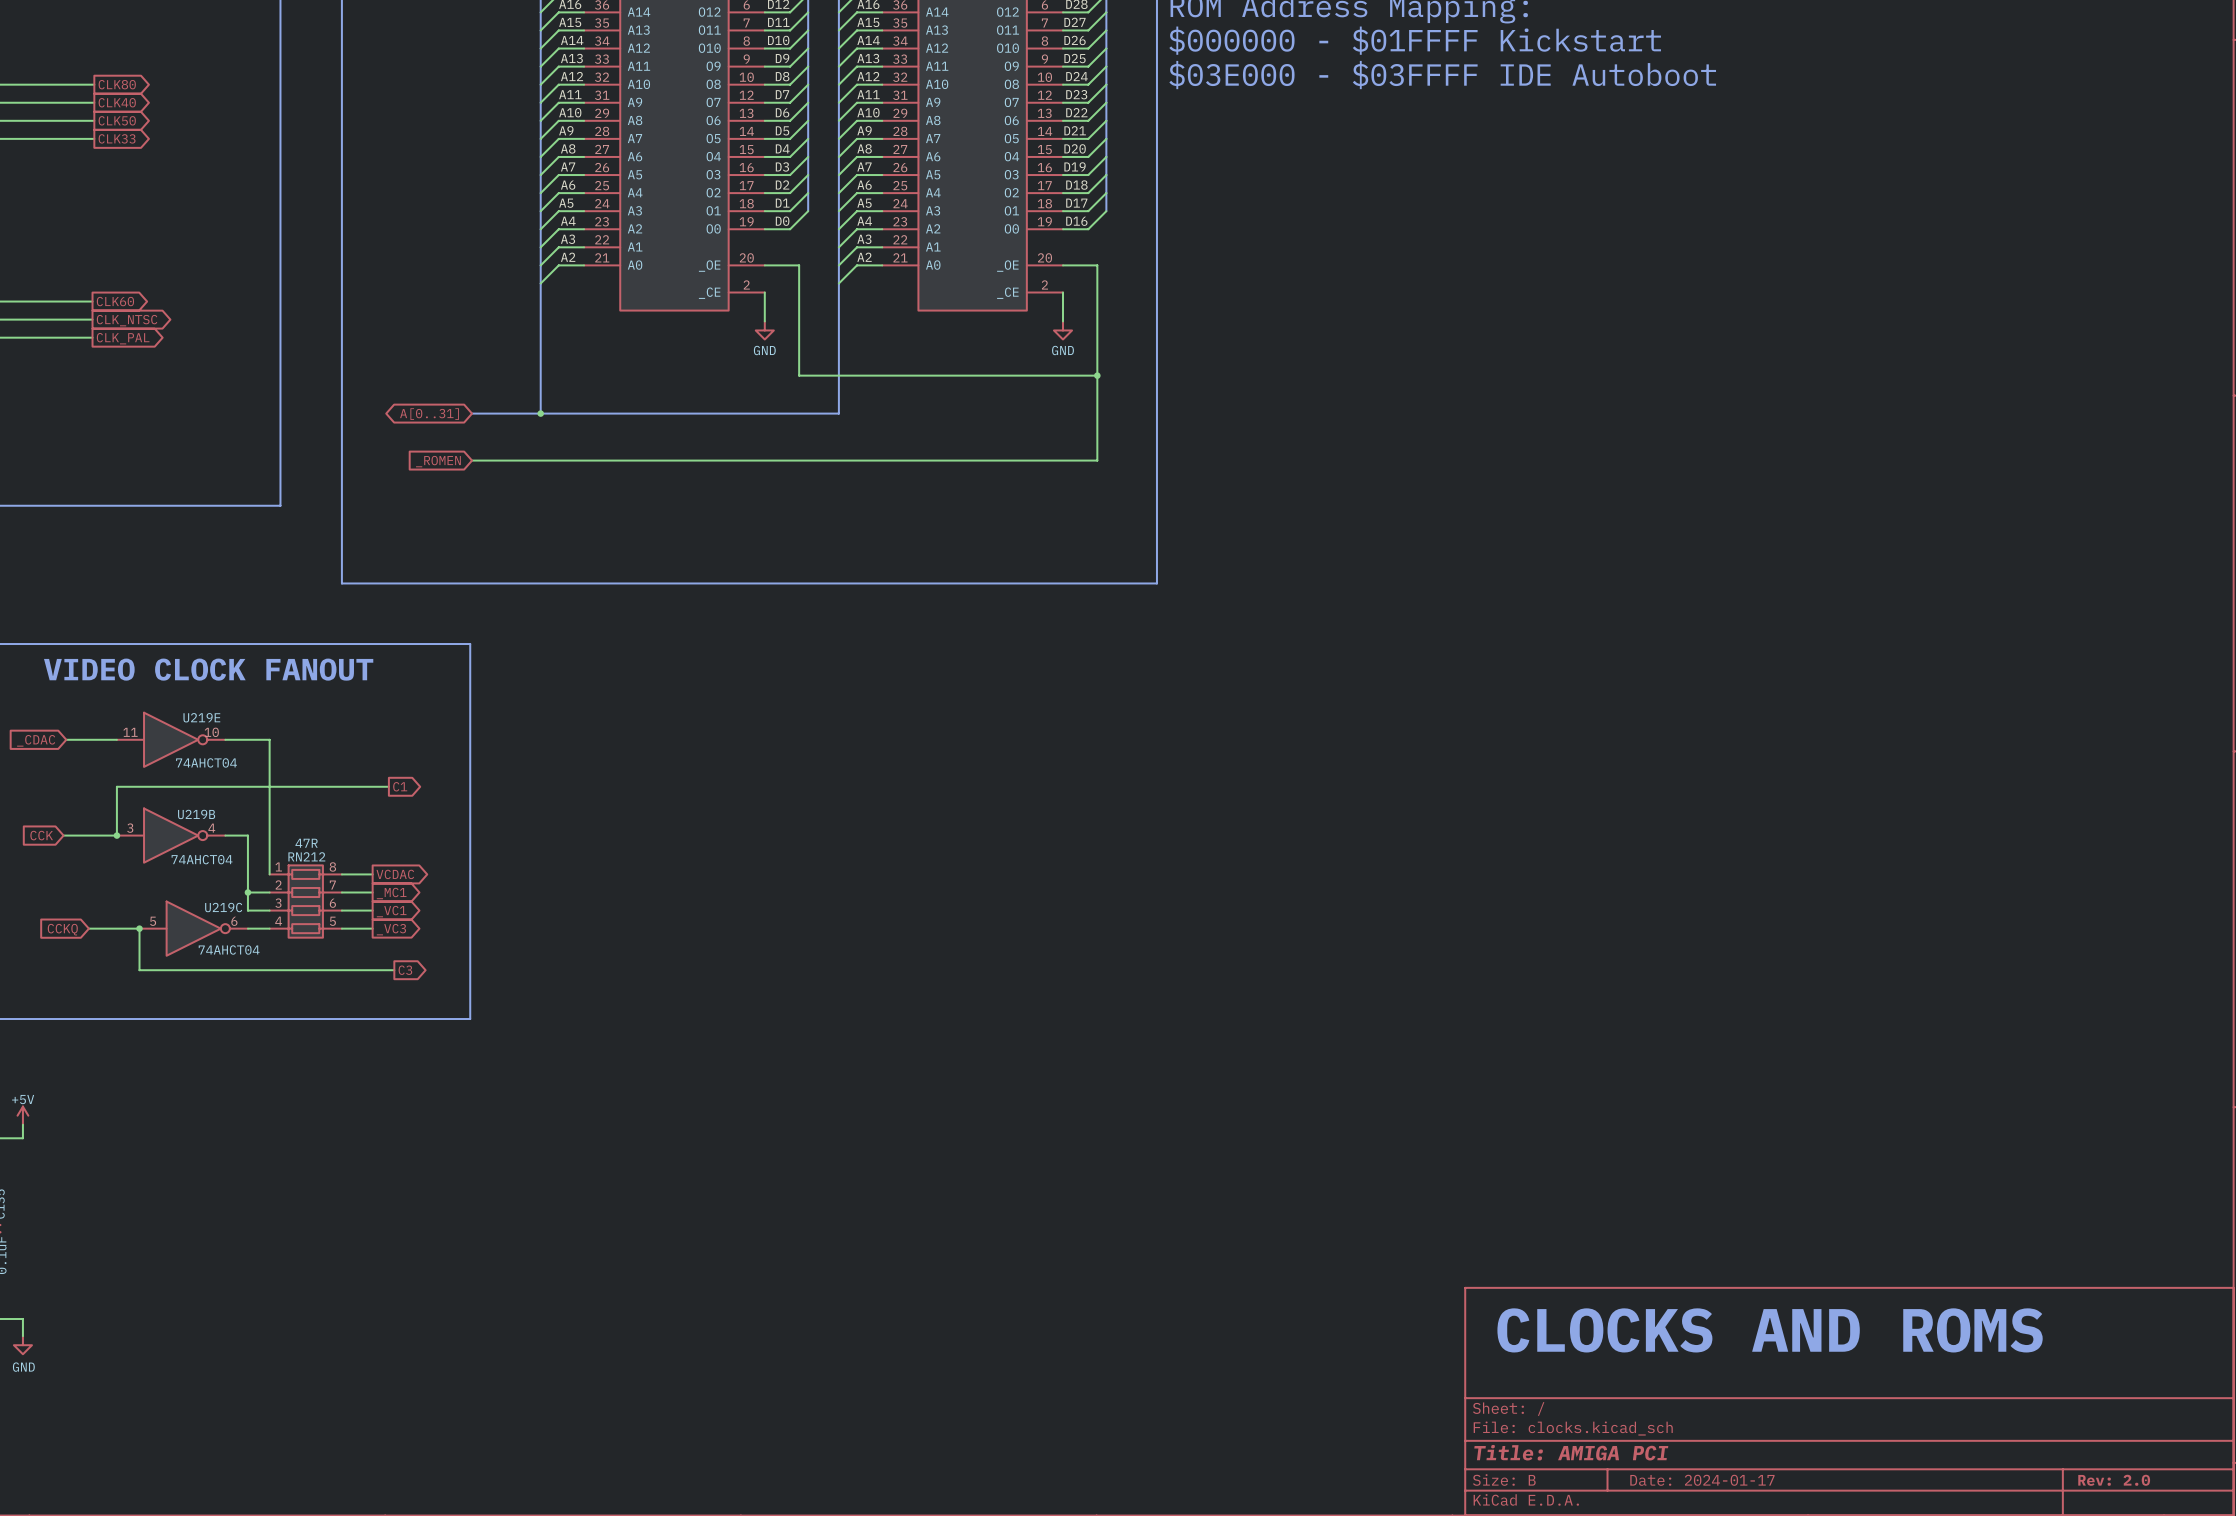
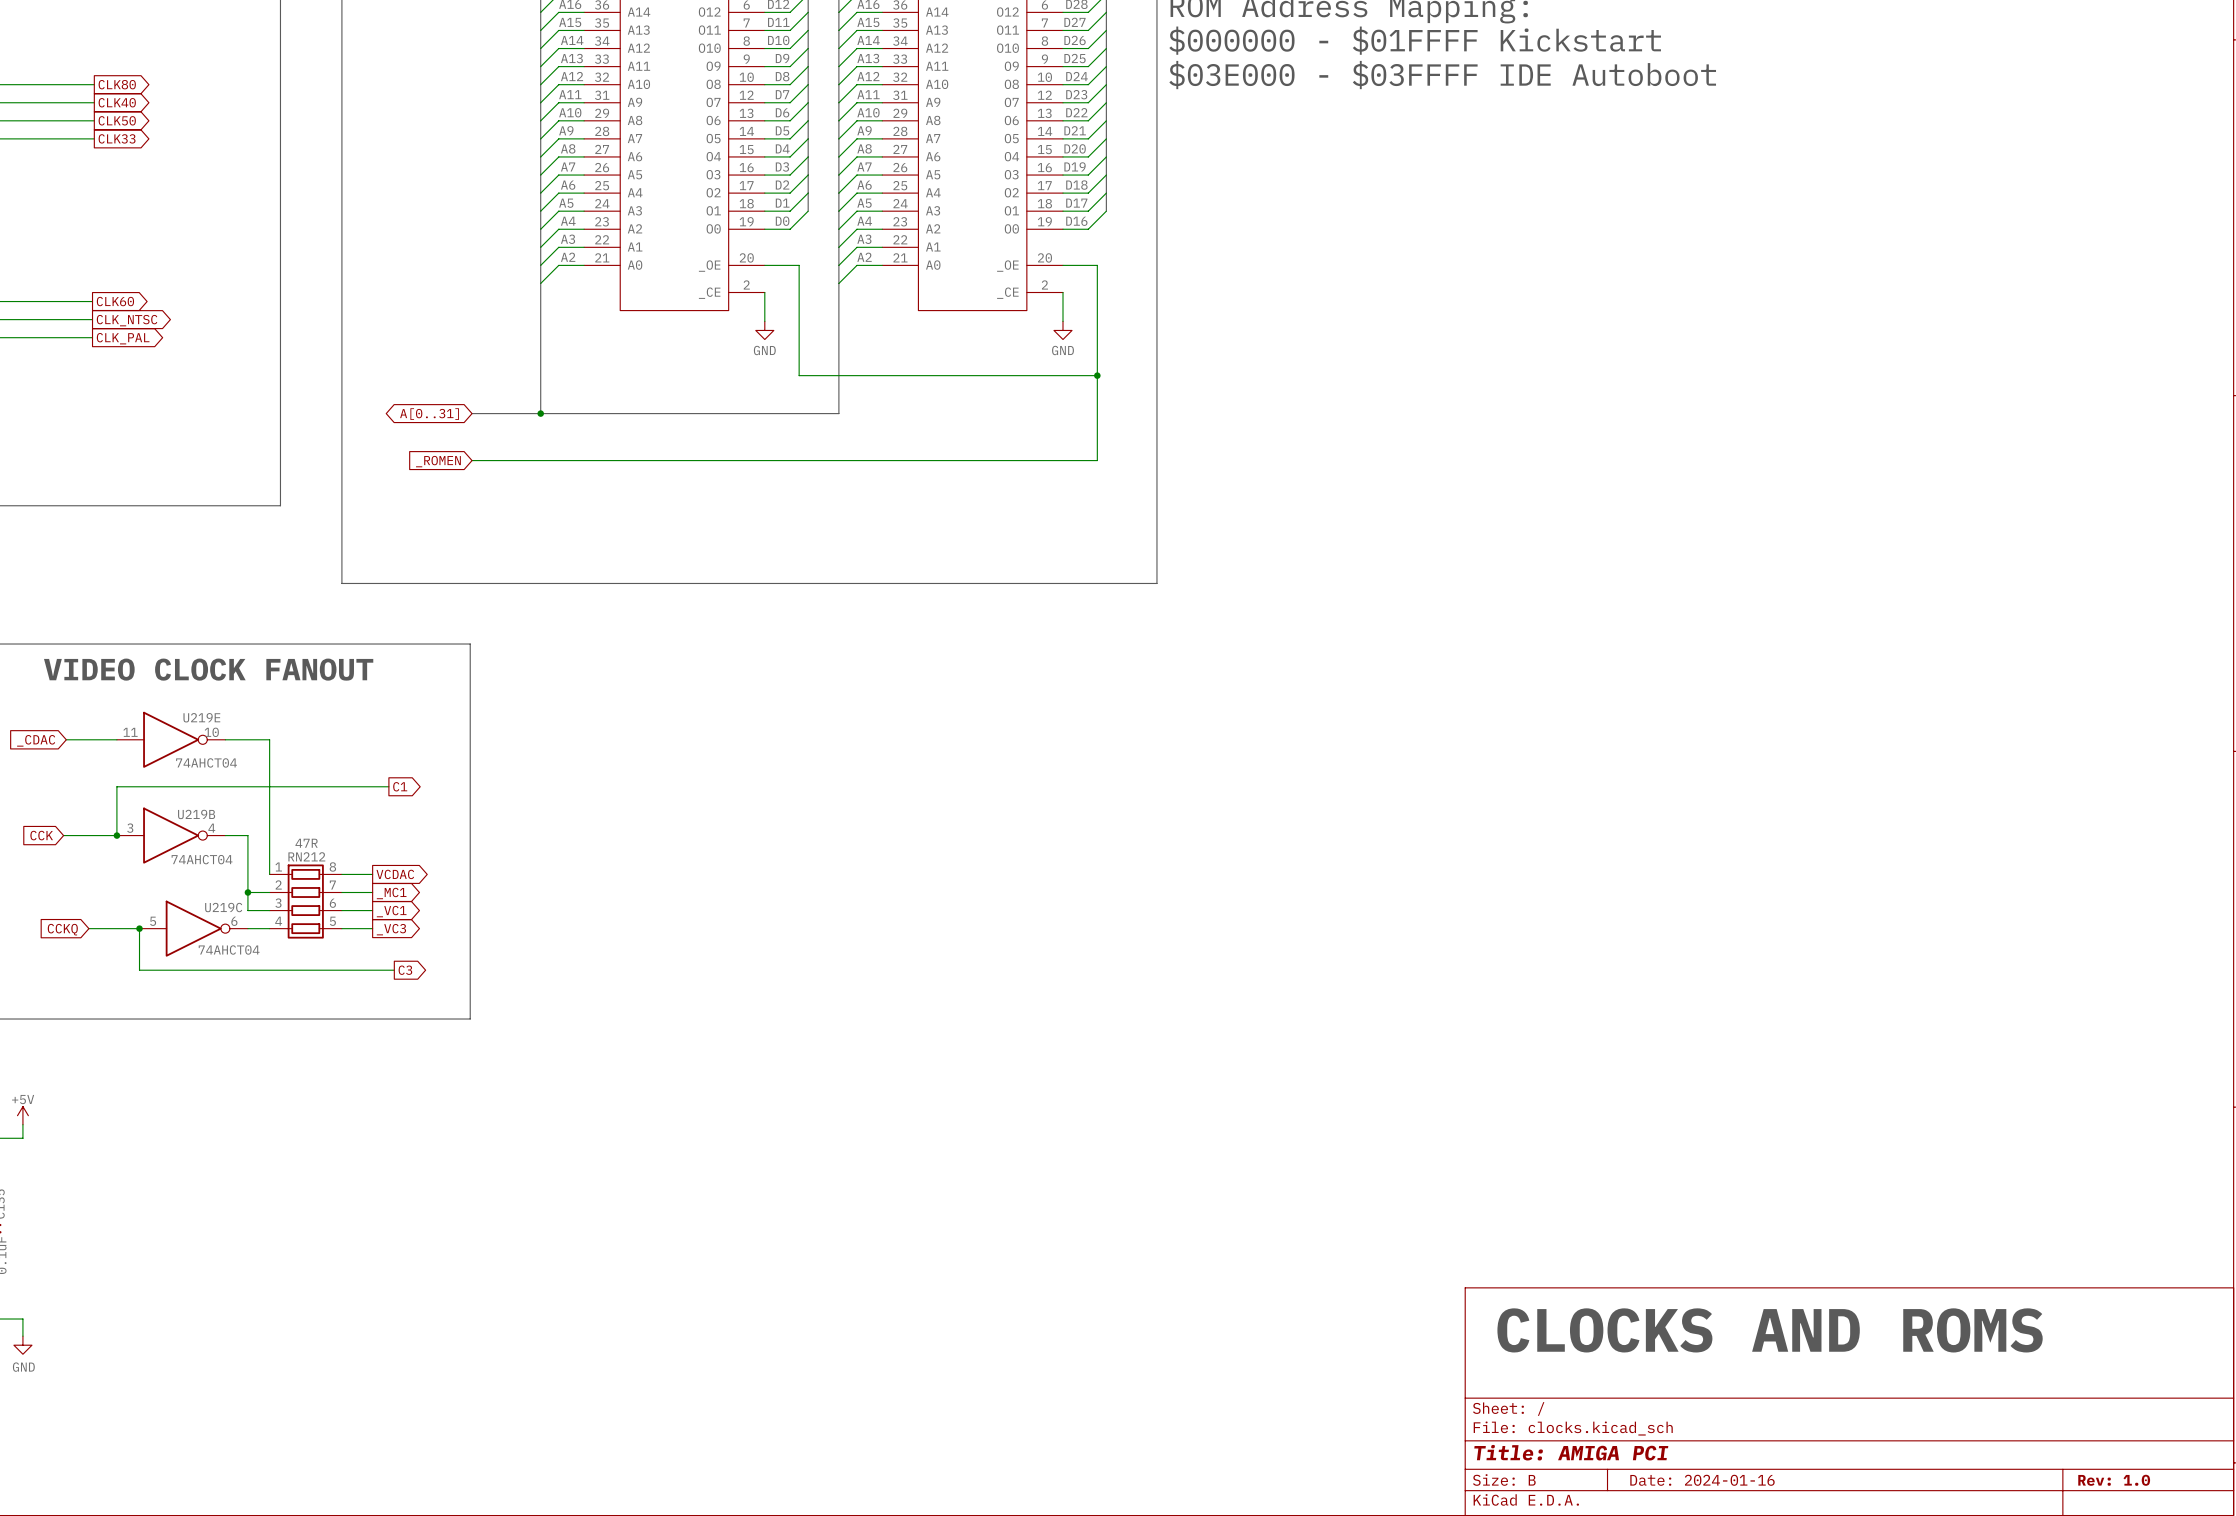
title block: Date: 2024-01-17 (1702, 1480) -> Date: 2024-01-16 (1702, 1480)
title block: Rev: 2.0 (2114, 1480) -> Rev: 1.0 (2114, 1480)

